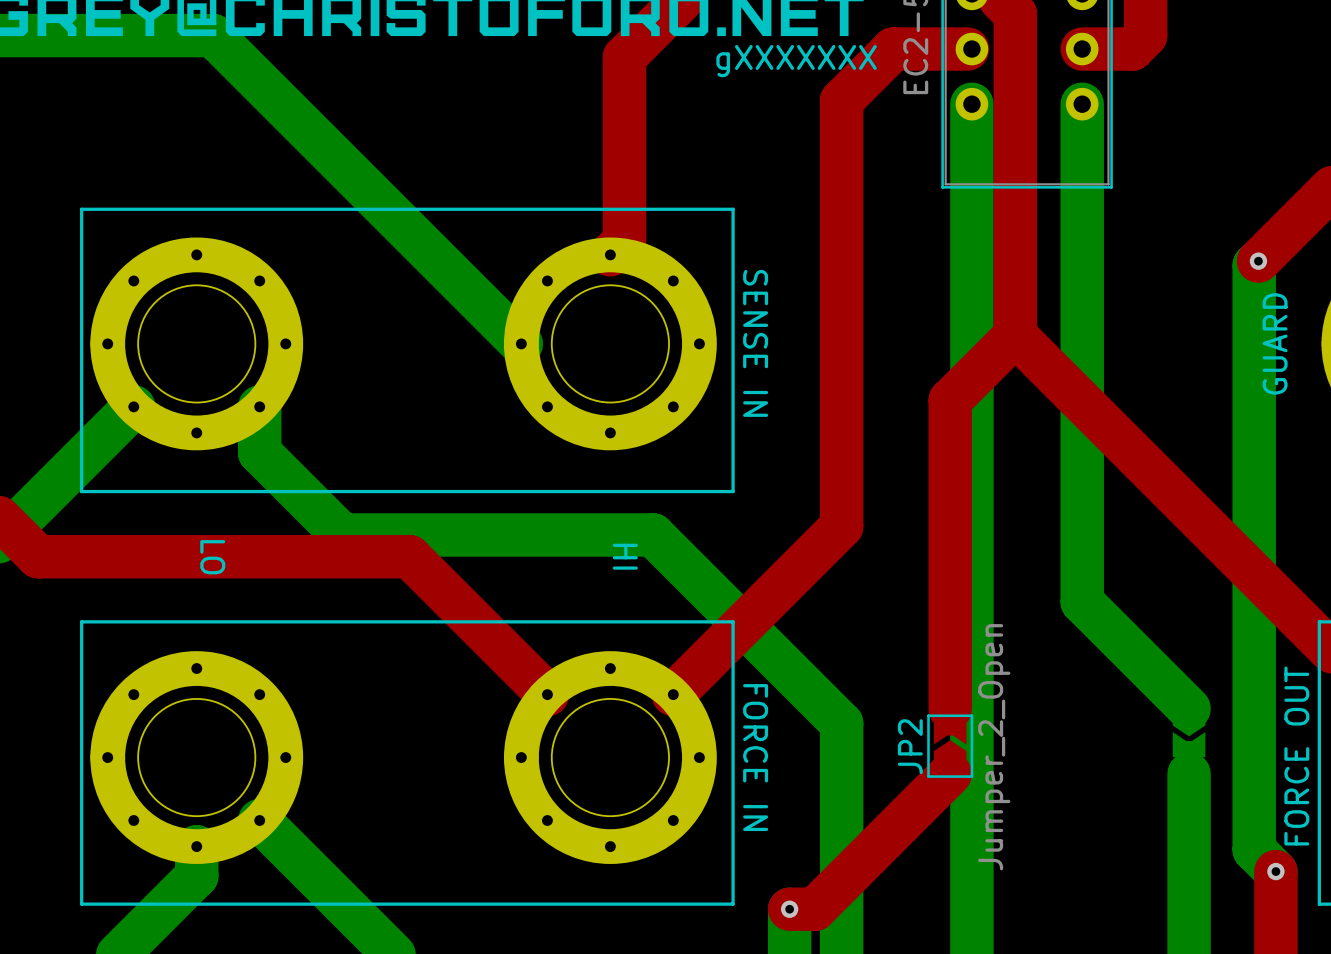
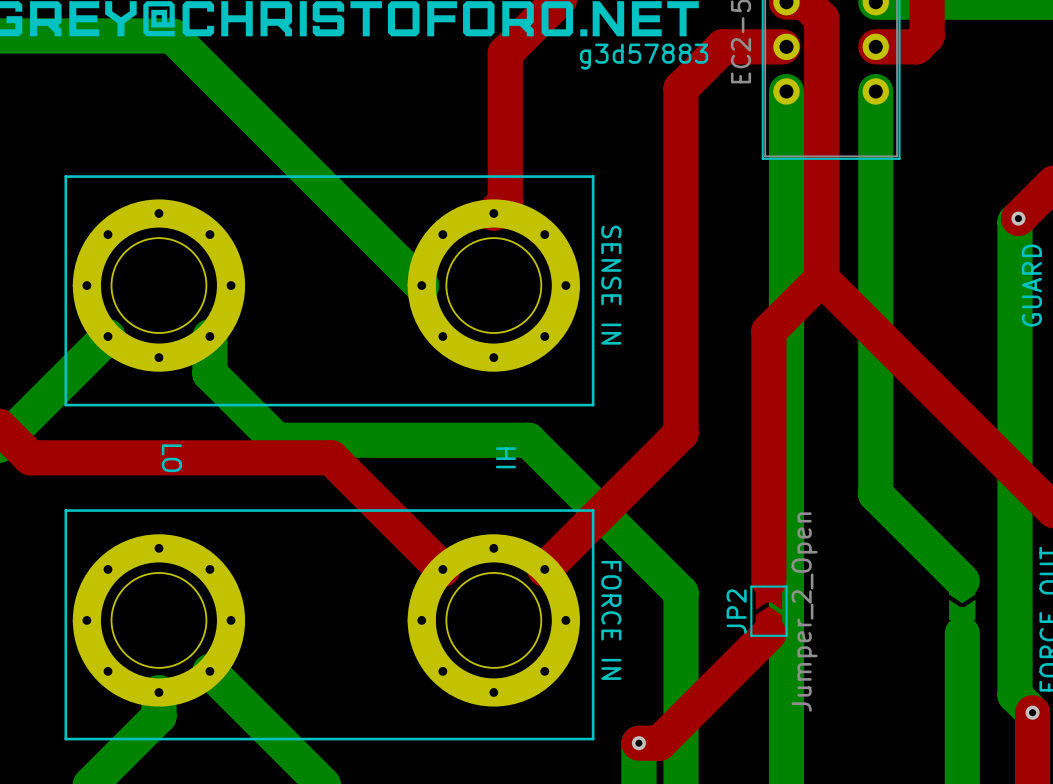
text: gXXXXXXX (796, 61) -> g3d57883 (644, 56)

